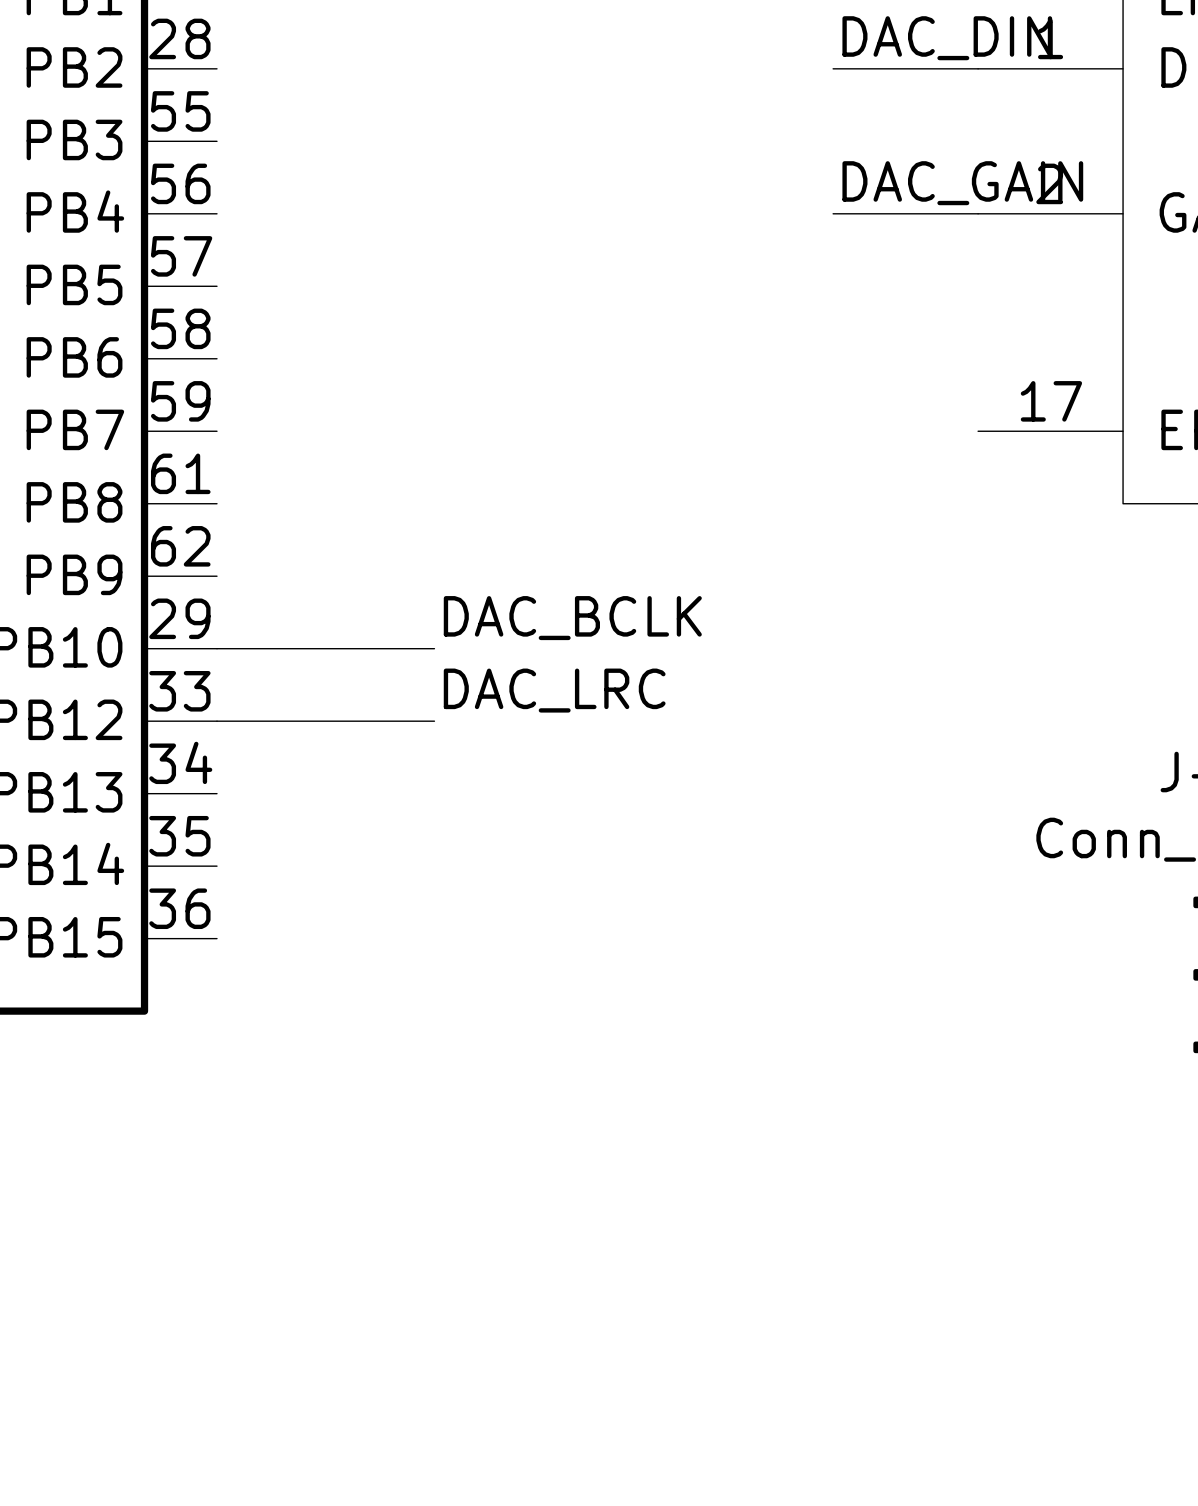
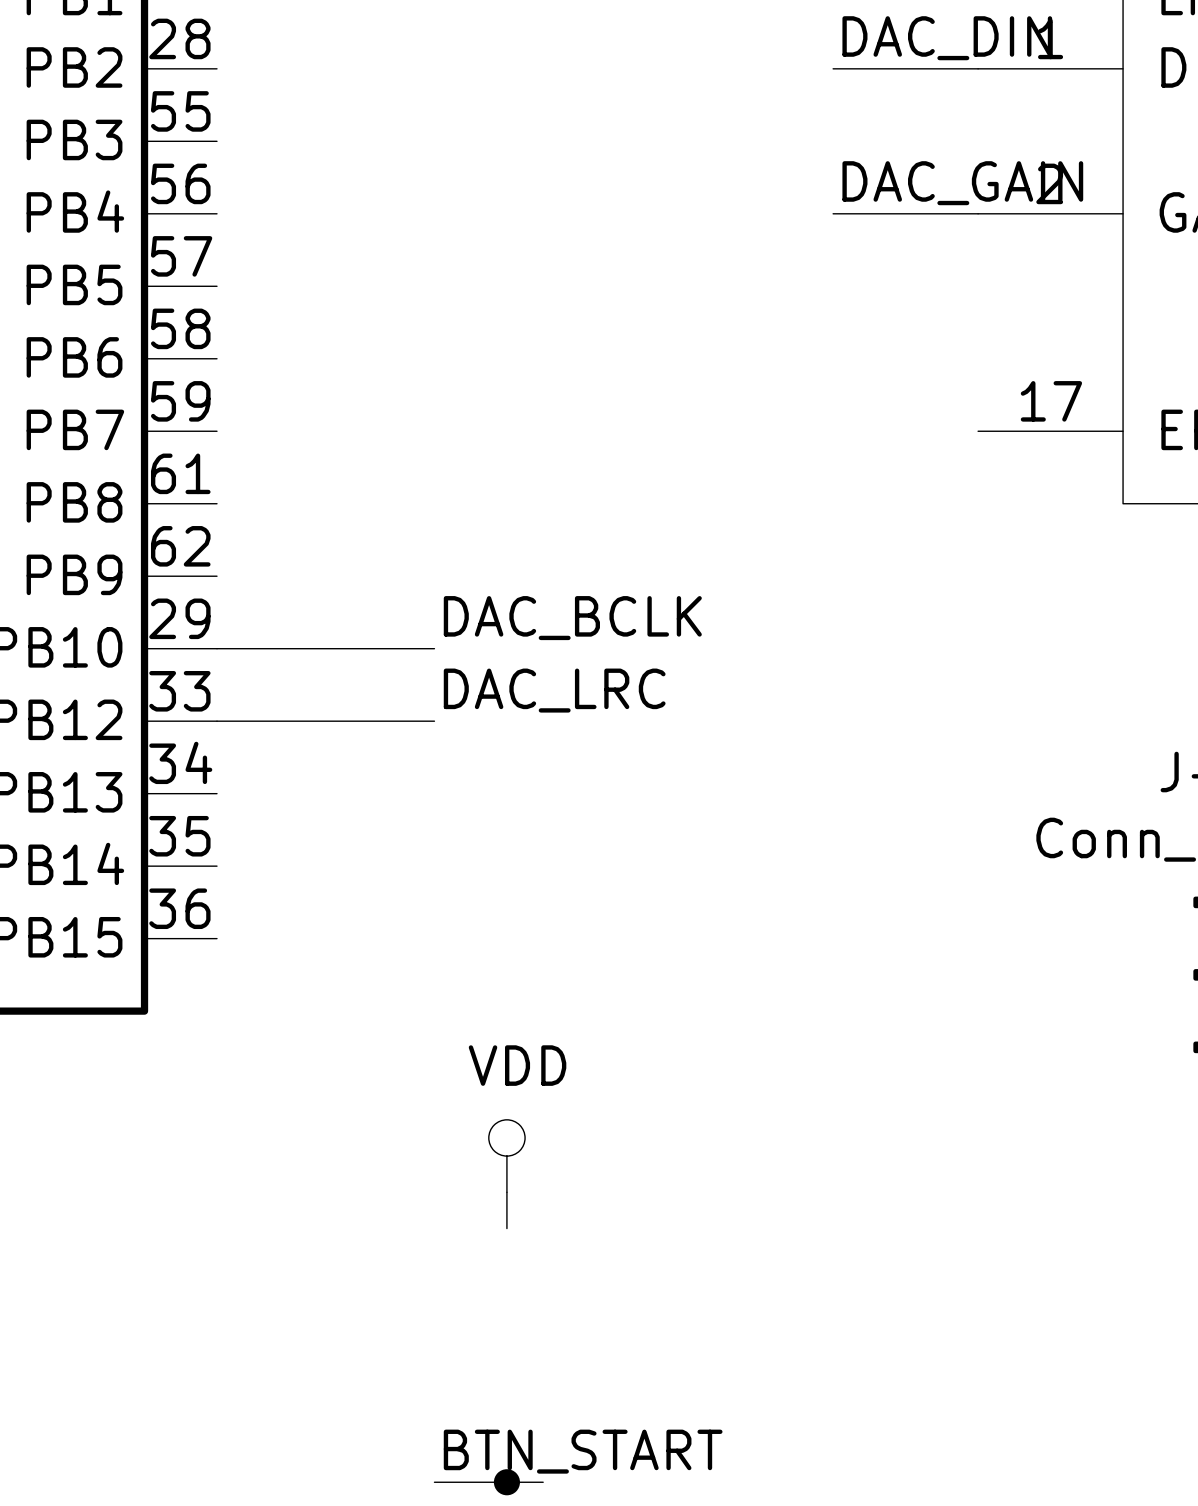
power symbol: none -> VDD (506, 1156)
wire: none -> (506, 1192) (506, 1228)
label: none -> BTN_START (583, 1451)
wire: none -> (434, 1482) (543, 1482)
junction: none -> (506, 1482)

